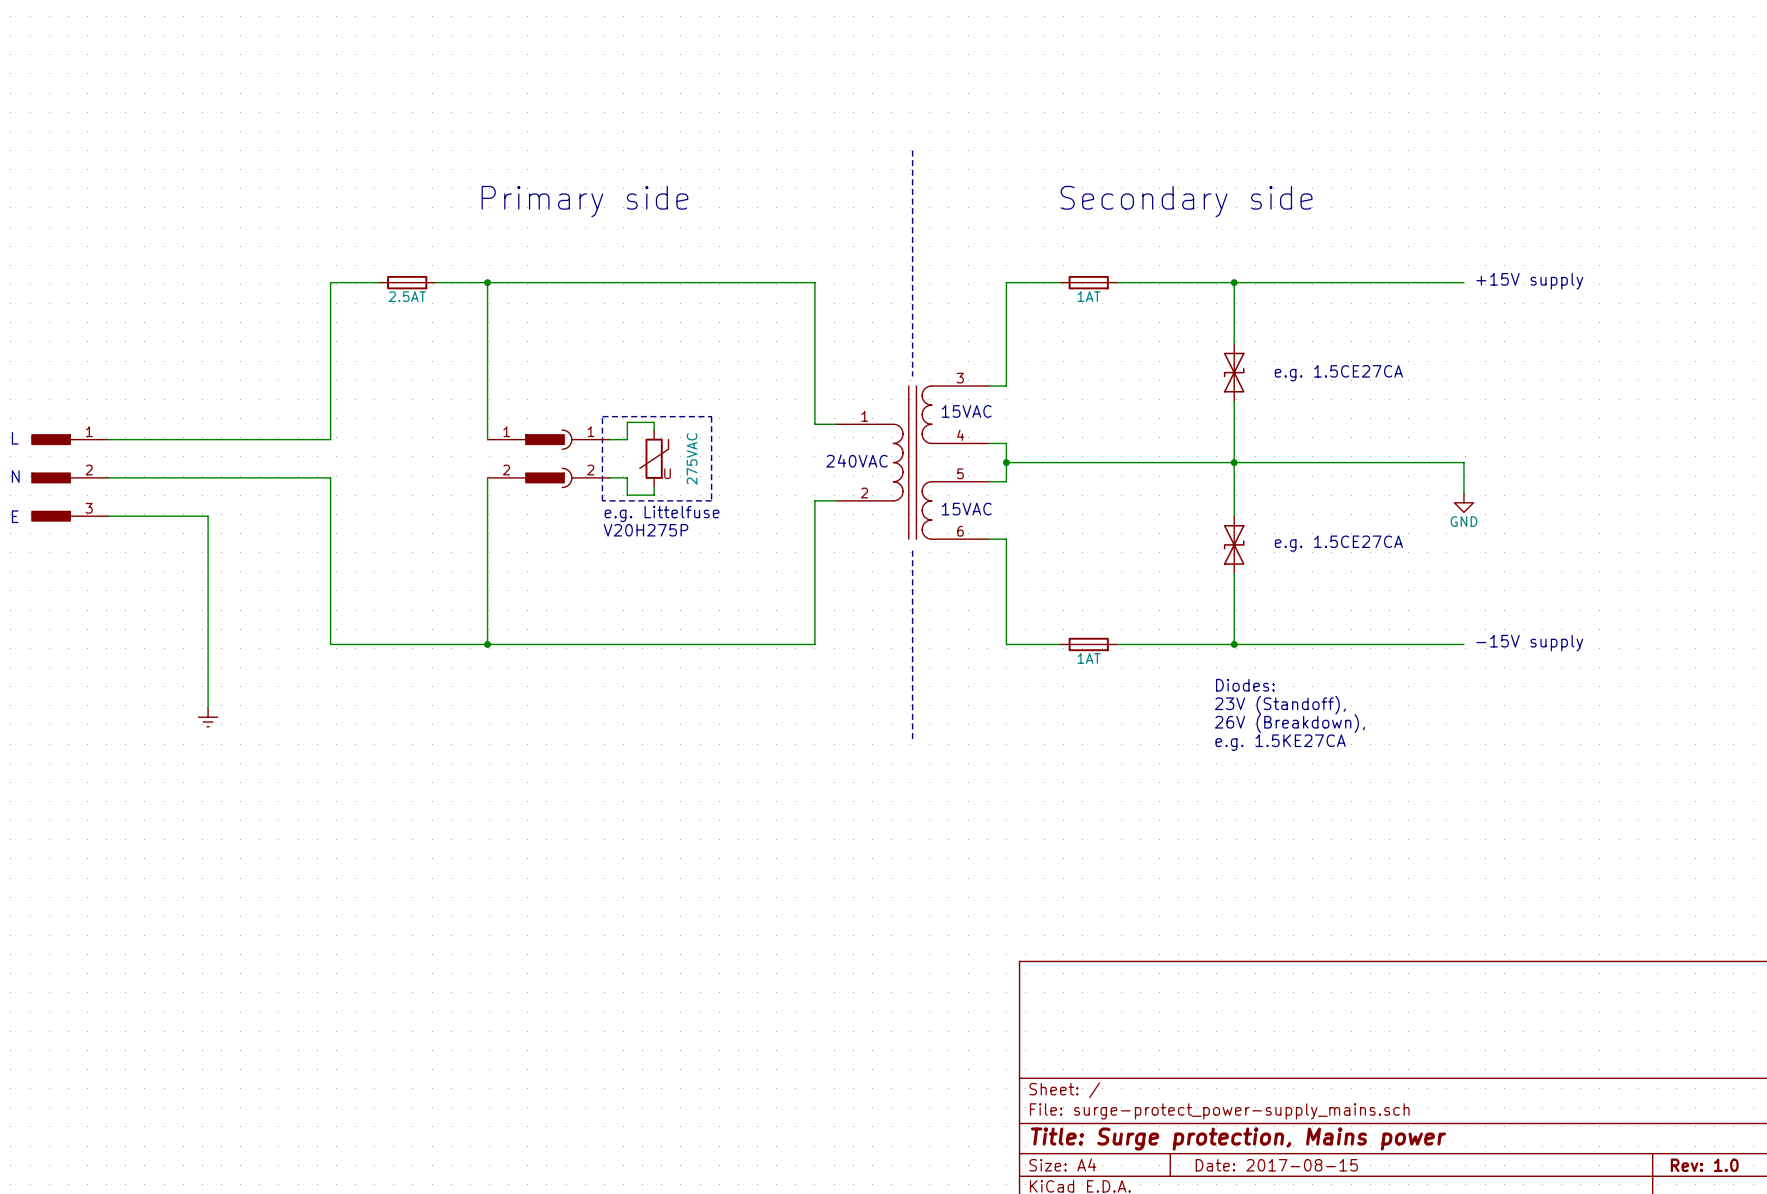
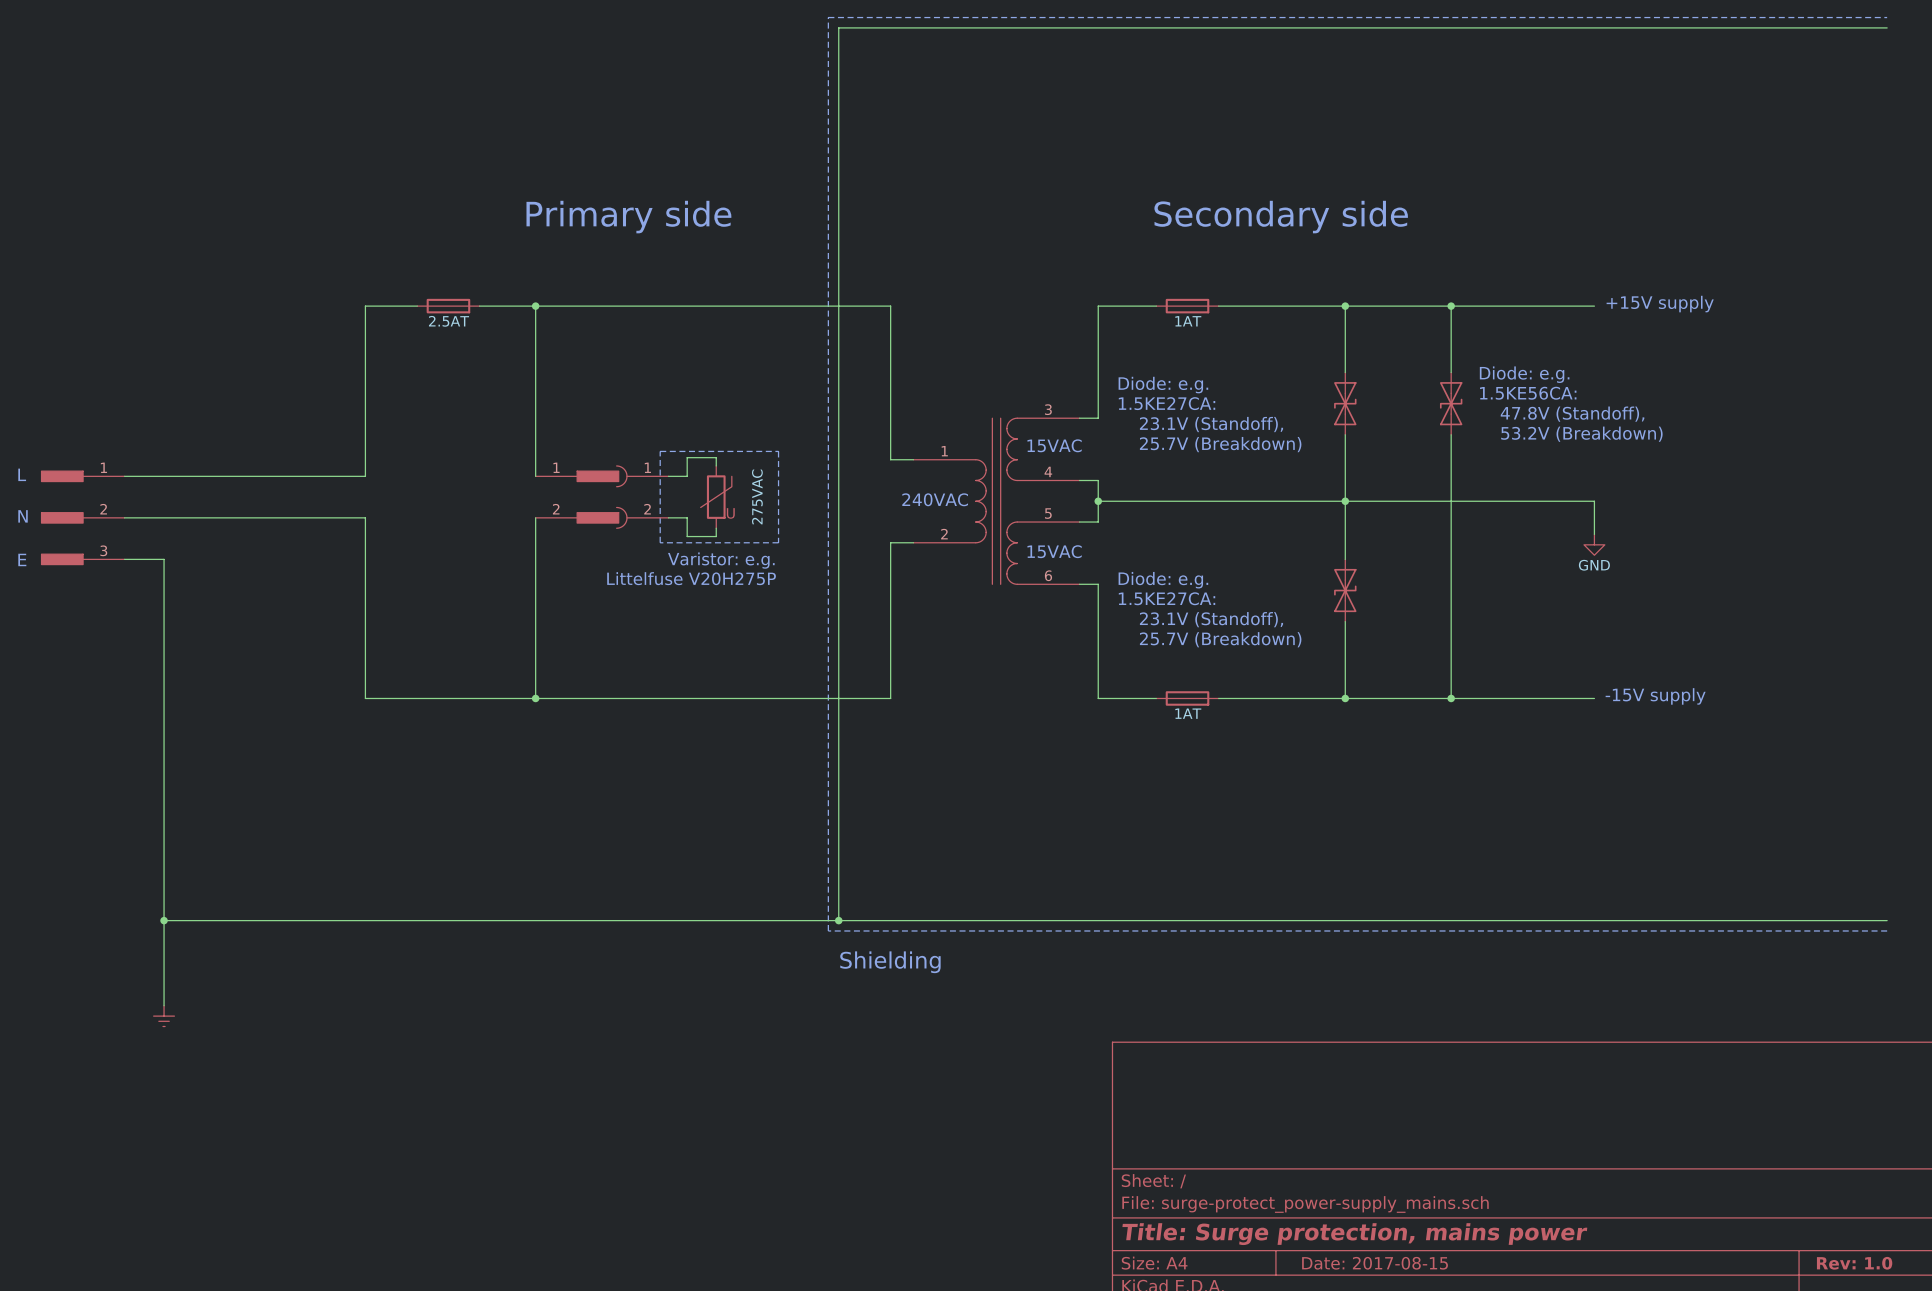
line: none -> (1887, 17) (828, 17) (828, 930) (1887, 930)
wire: none -> (1887, 27) (838, 27) (838, 920)
line: (912, 150) (912, 376) -> none
wire: none -> (1451, 306) (1451, 372)
junction: none -> (1451, 306)
text: none -> Diode: e.g. (1524, 374)
text: none -> Diode: e.g. (1163, 385)
text: none -> 1.5KE56CA: (1528, 393)
text: none -> 1.5KE27CA: (1167, 403)
part: none -> (1451, 403)
text: e.g. 1.5CE27CA (1338, 373) -> none
text: none -> 47.8V (Standoff), (1572, 414)
text: none -> 23.1V (Standoff), (1211, 424)
wire: none -> (1451, 434) (1451, 698)
text: none -> 53.2V (Breakdown) (1581, 434)
text: none -> 25.7V (Breakdown) (1220, 444)
text: e.g. Littelfuse (662, 513) -> none
wire: (144, 516) (208, 516) (208, 707) -> (164, 559) (164, 1005)
text: none -> Varistor: e.g. (721, 560)
text: V20H275P (645, 530) -> none
text: none -> Littelfuse V20H275P (691, 578)
text: none -> Diode: e.g. (1163, 580)
text: e.g. 1.5CE27CA (1338, 543) -> none
line: (912, 550) (912, 742) -> none
text: none -> 1.5KE27CA: (1167, 598)
text: none -> 23.1V (Standoff), (1211, 619)
text: none -> 25.7V (Breakdown) (1220, 639)
junction: none -> (1451, 698)
text: Diodes: (1245, 685) -> none
text: 23V (Standoff), (1280, 705) -> none
power symbol: (208, 717) -> none
text: 26V (Breakdown), (1289, 723) -> none
text: e.g. 1.5KE27CA (1280, 742) -> none
wire: none -> (164, 920) (1887, 920)
junction: none -> (164, 920)
junction: none -> (838, 920)
text: none -> Shielding (890, 962)
power symbol: none -> (164, 1016)
title block: Title: Surge protection, Mains power (1238, 1139) -> Title: Surge protection, mains power (1354, 1234)

